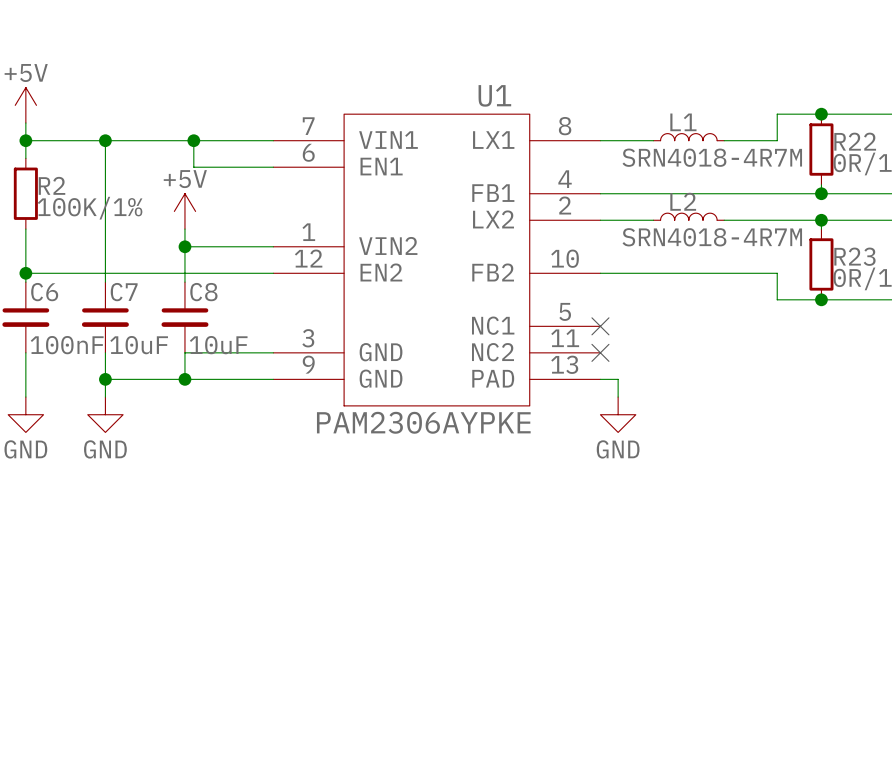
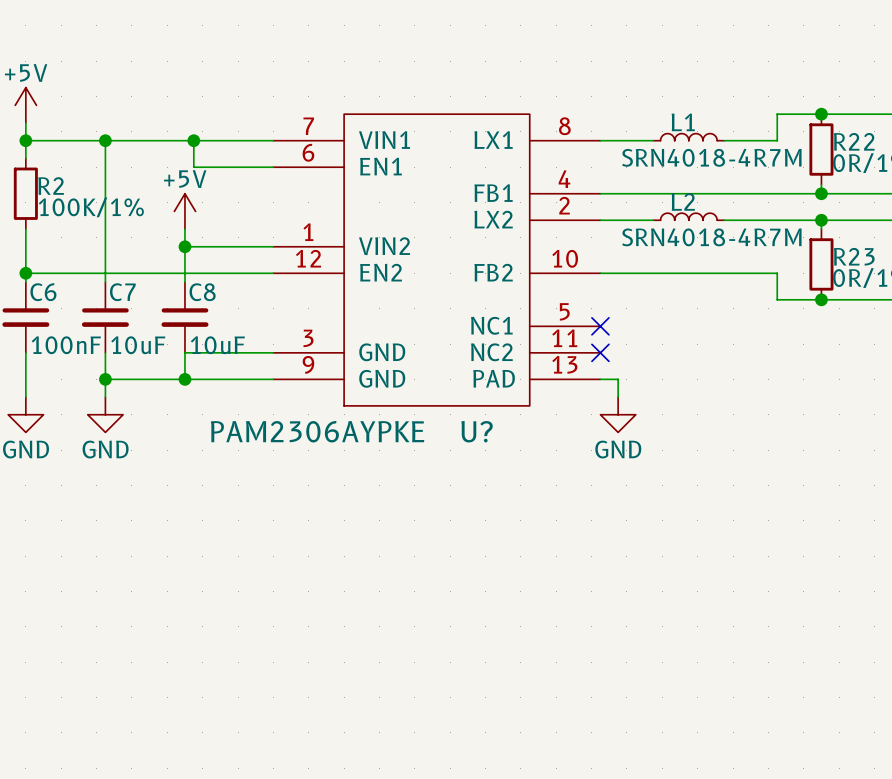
U1 name: U1 (494, 95) -> U? (477, 431)
U1 value position: PAM2306AYPKE (423, 422) -> PAM2306AYPKE (317, 431)

